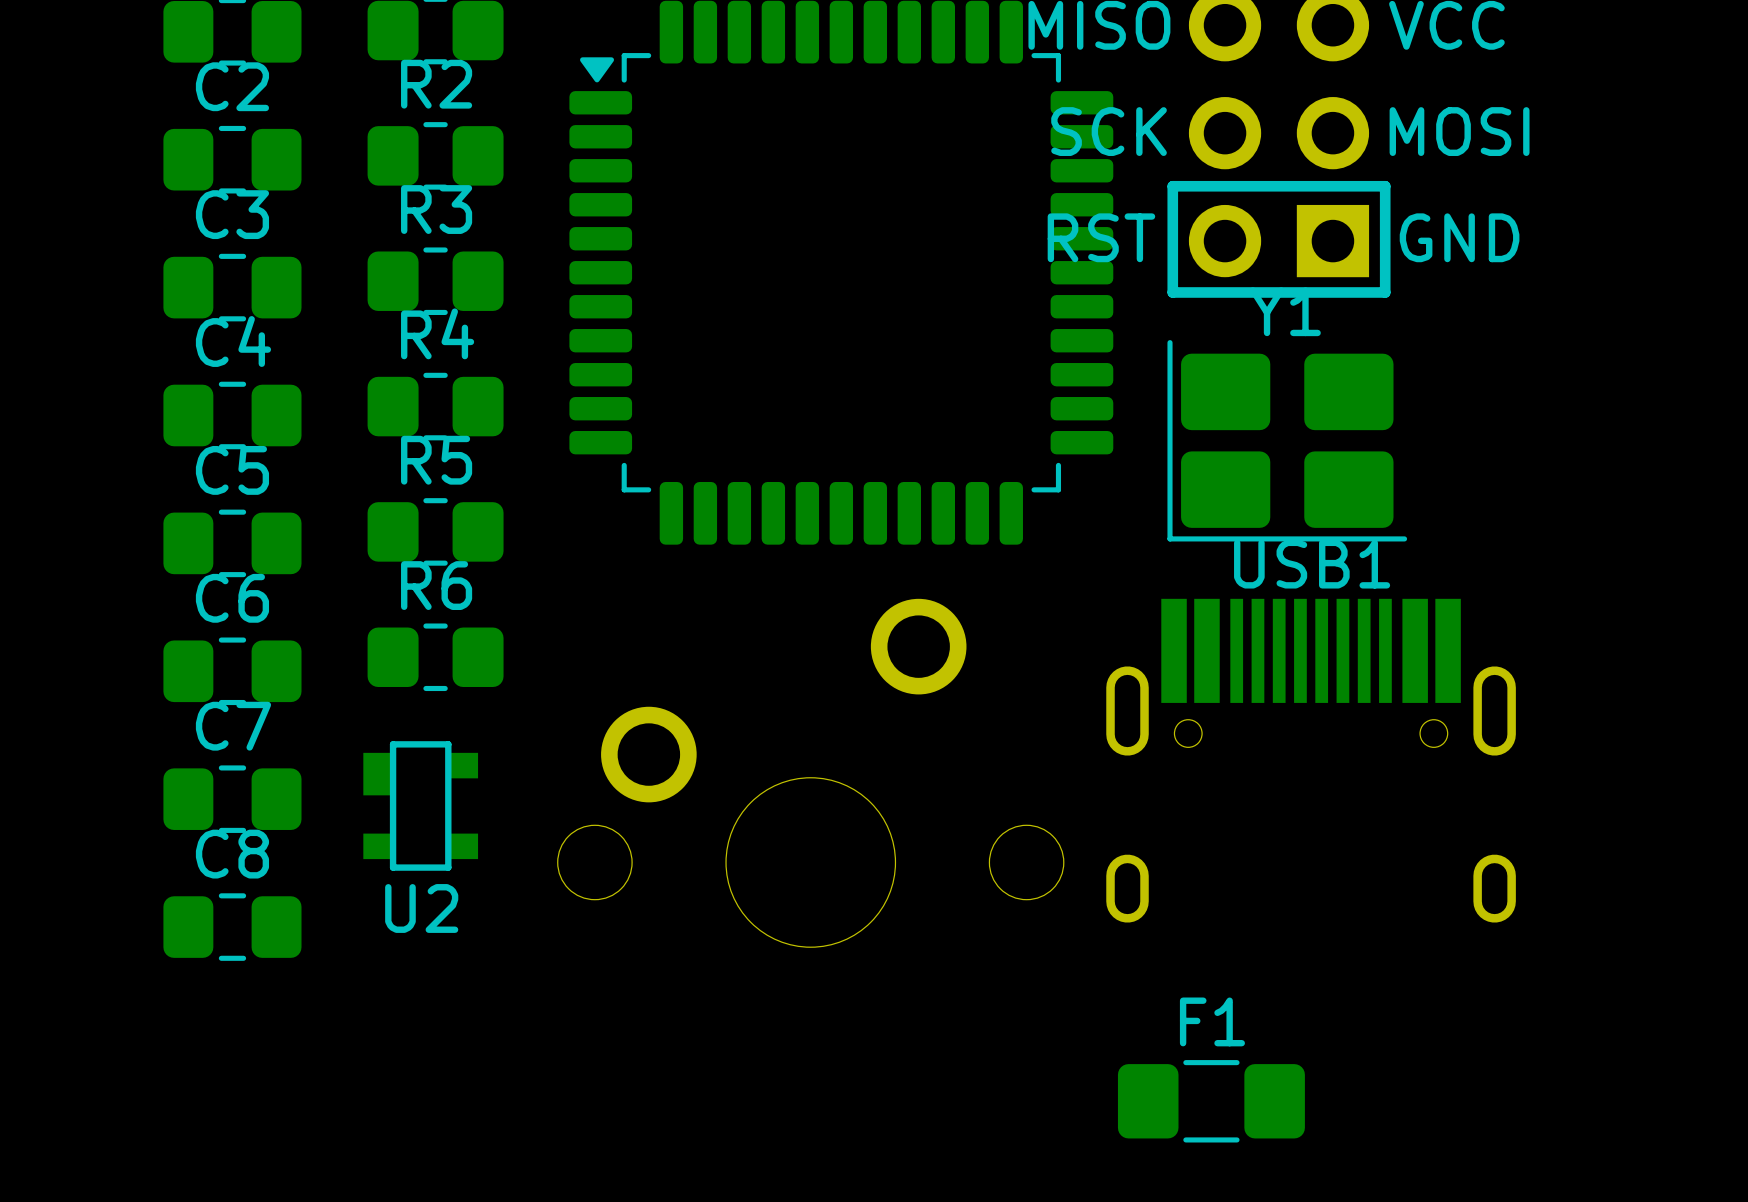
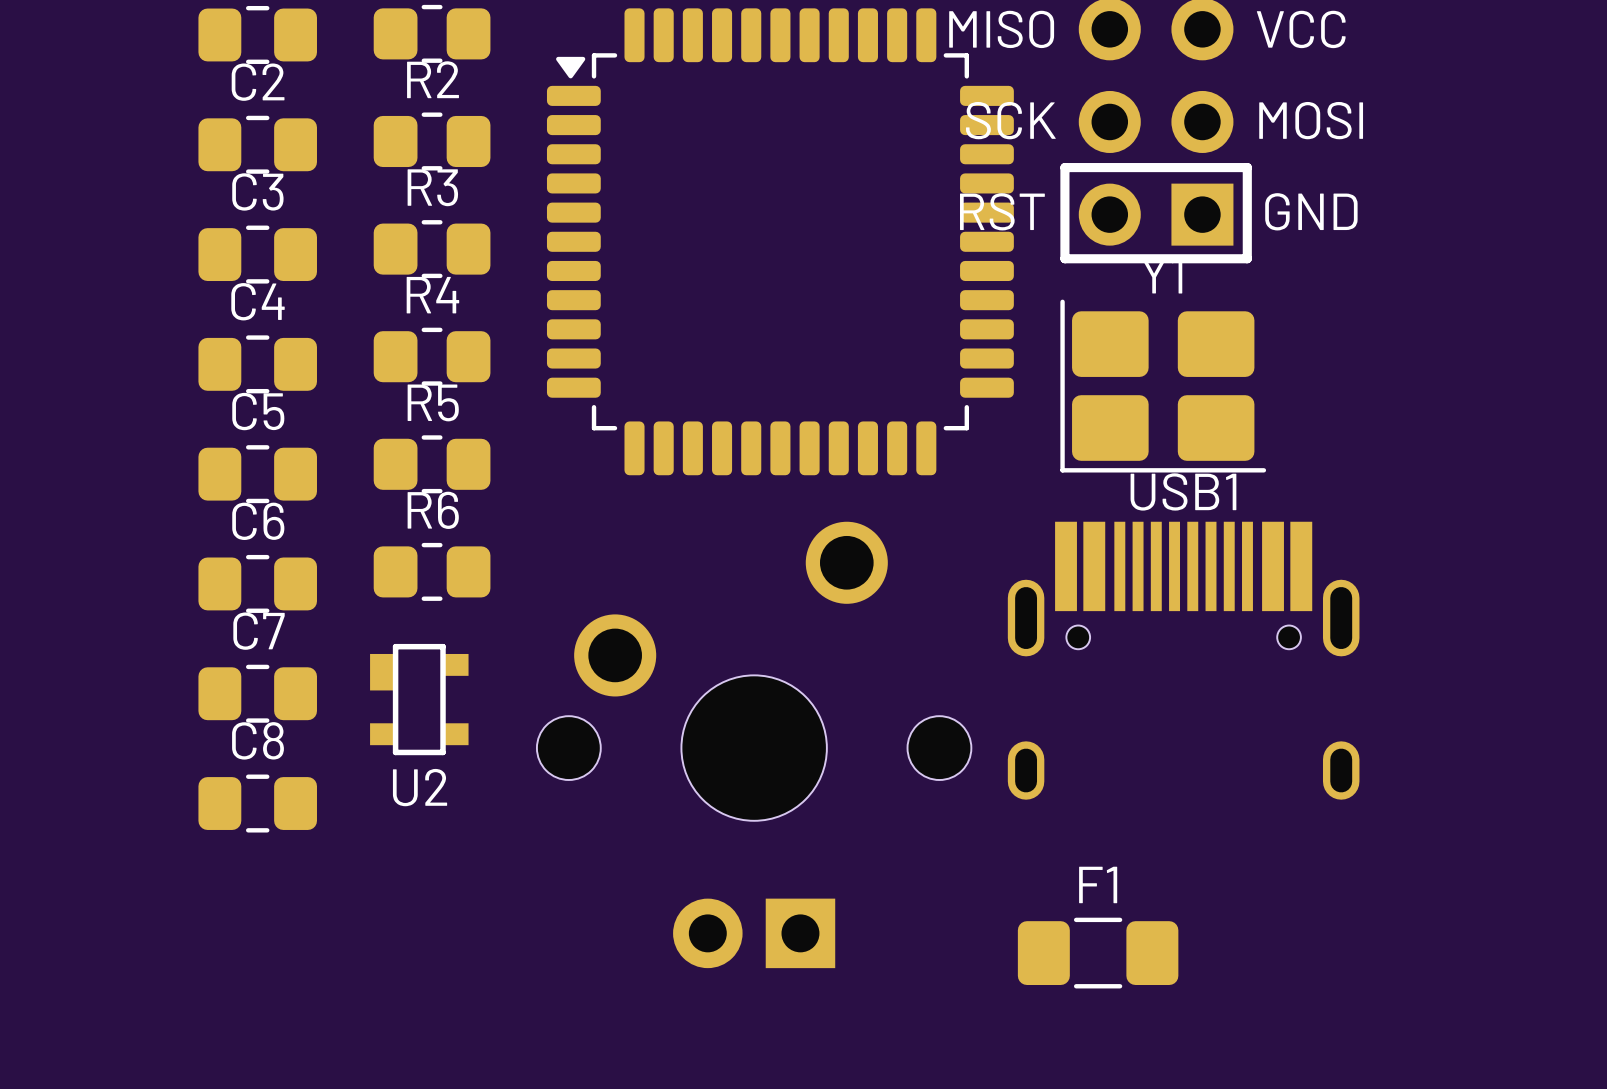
part: none -> (754, 744)

